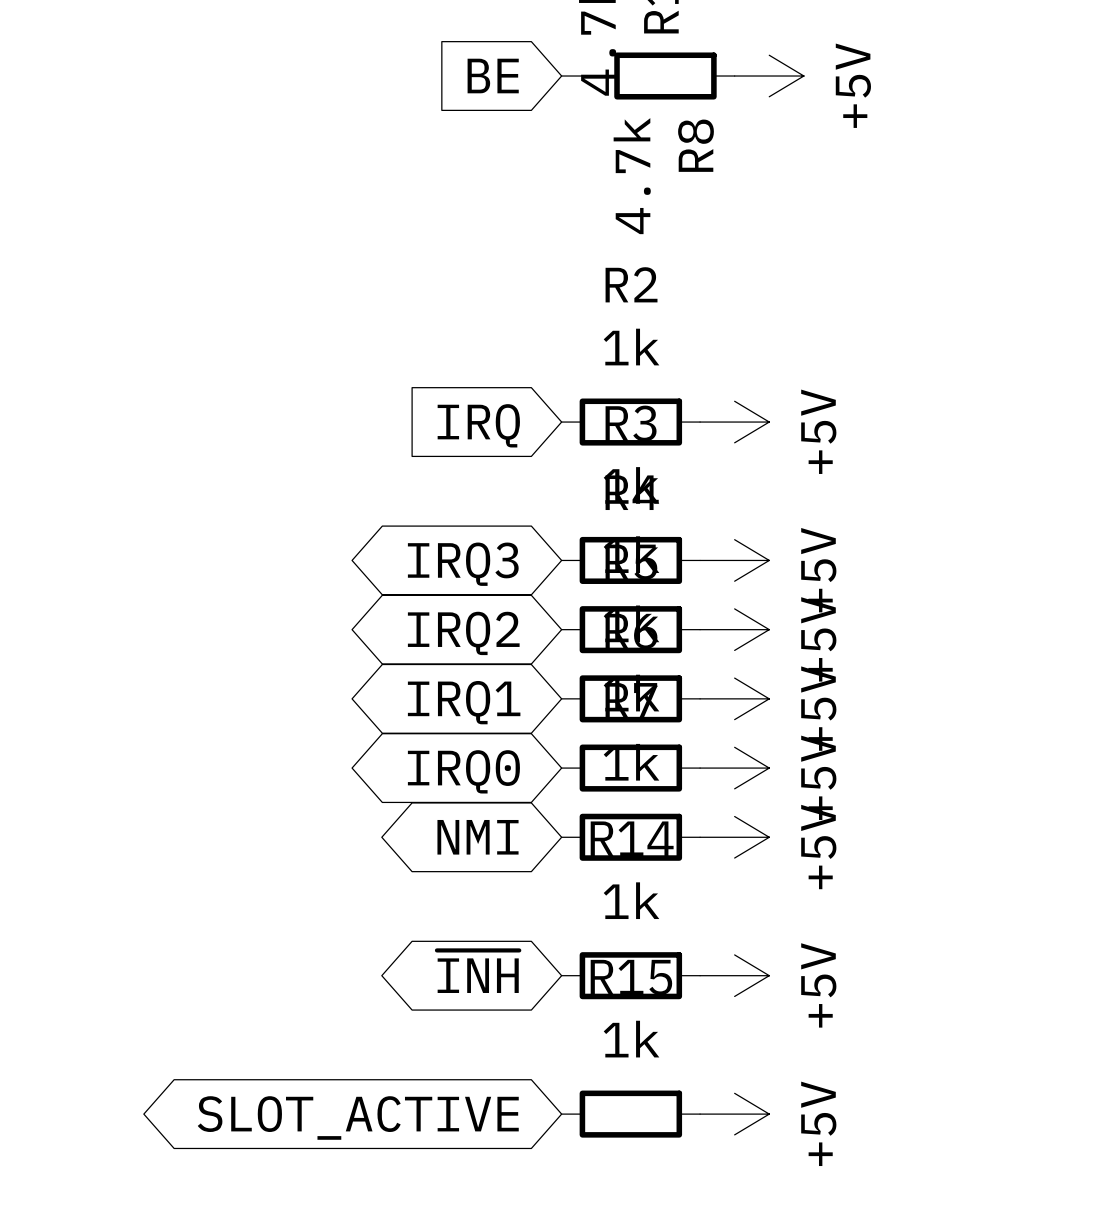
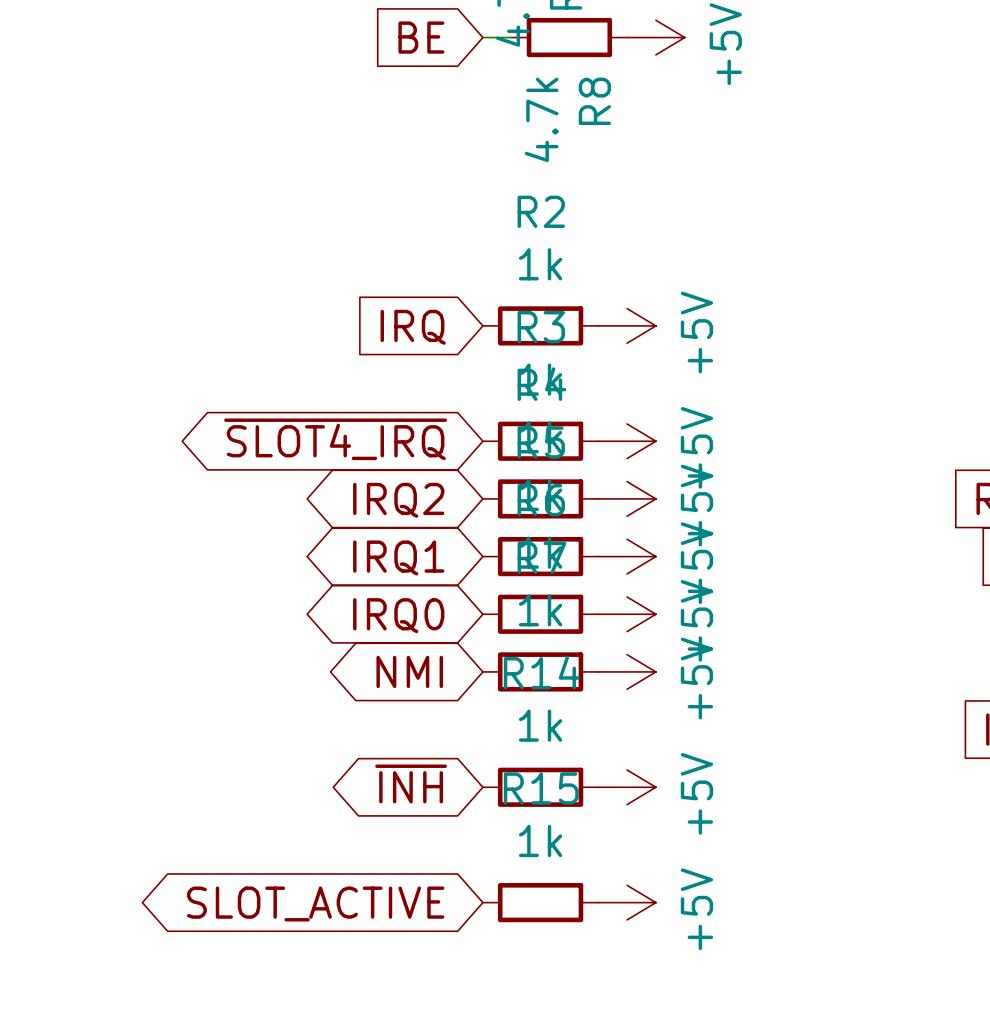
global label: IRQ3 (463, 564) -> ~{SLOT4_IRQ} (335, 439)

